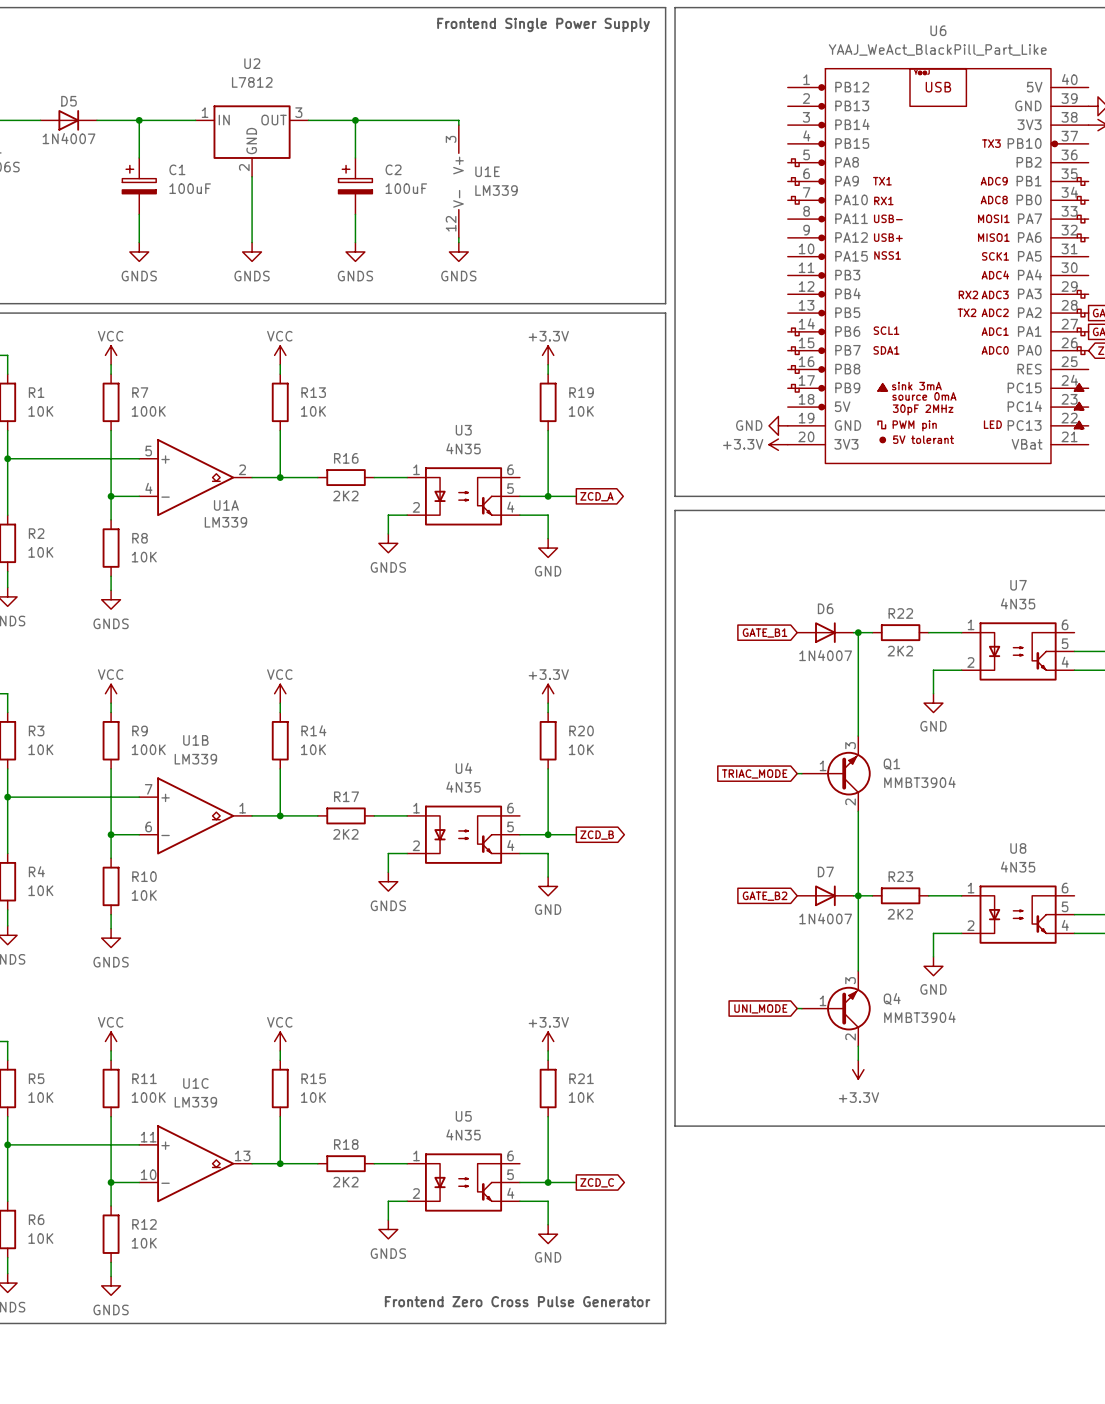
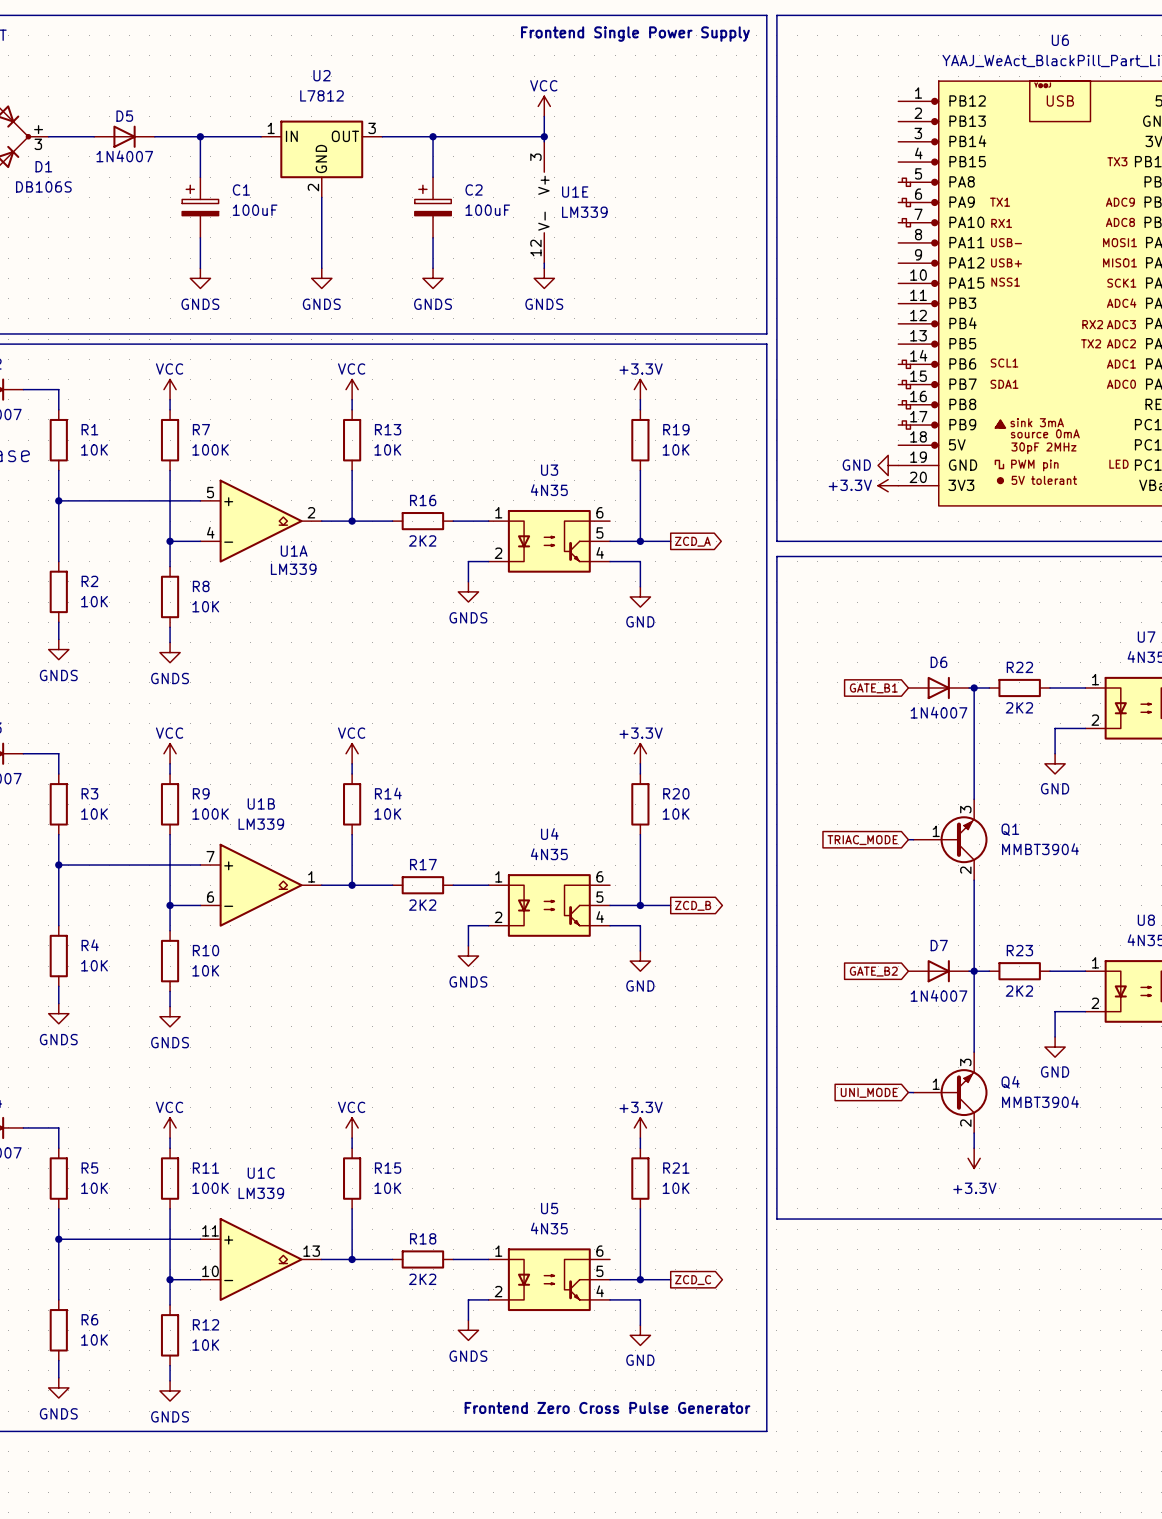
power symbol: none -> VCC (544, 106)
wire: none -> (544, 116) (544, 136)
junction: none -> (544, 136)

